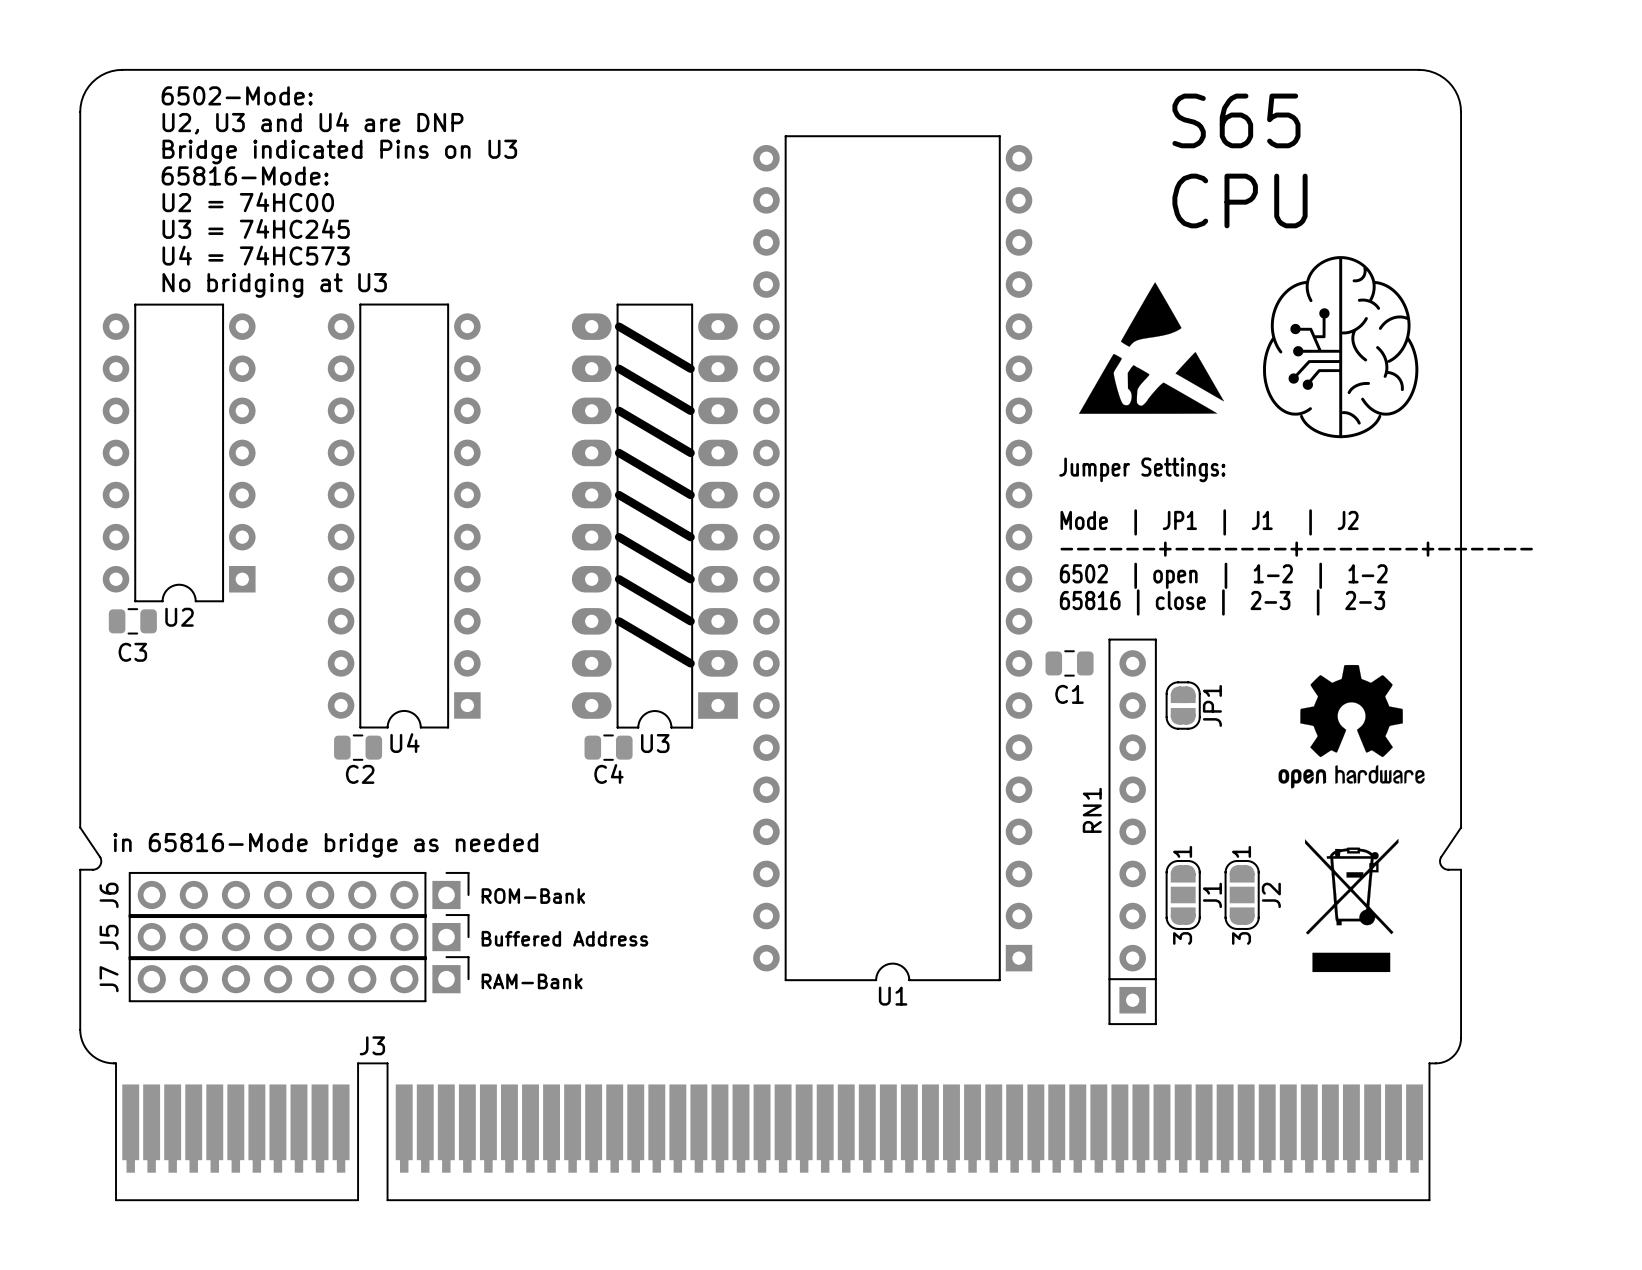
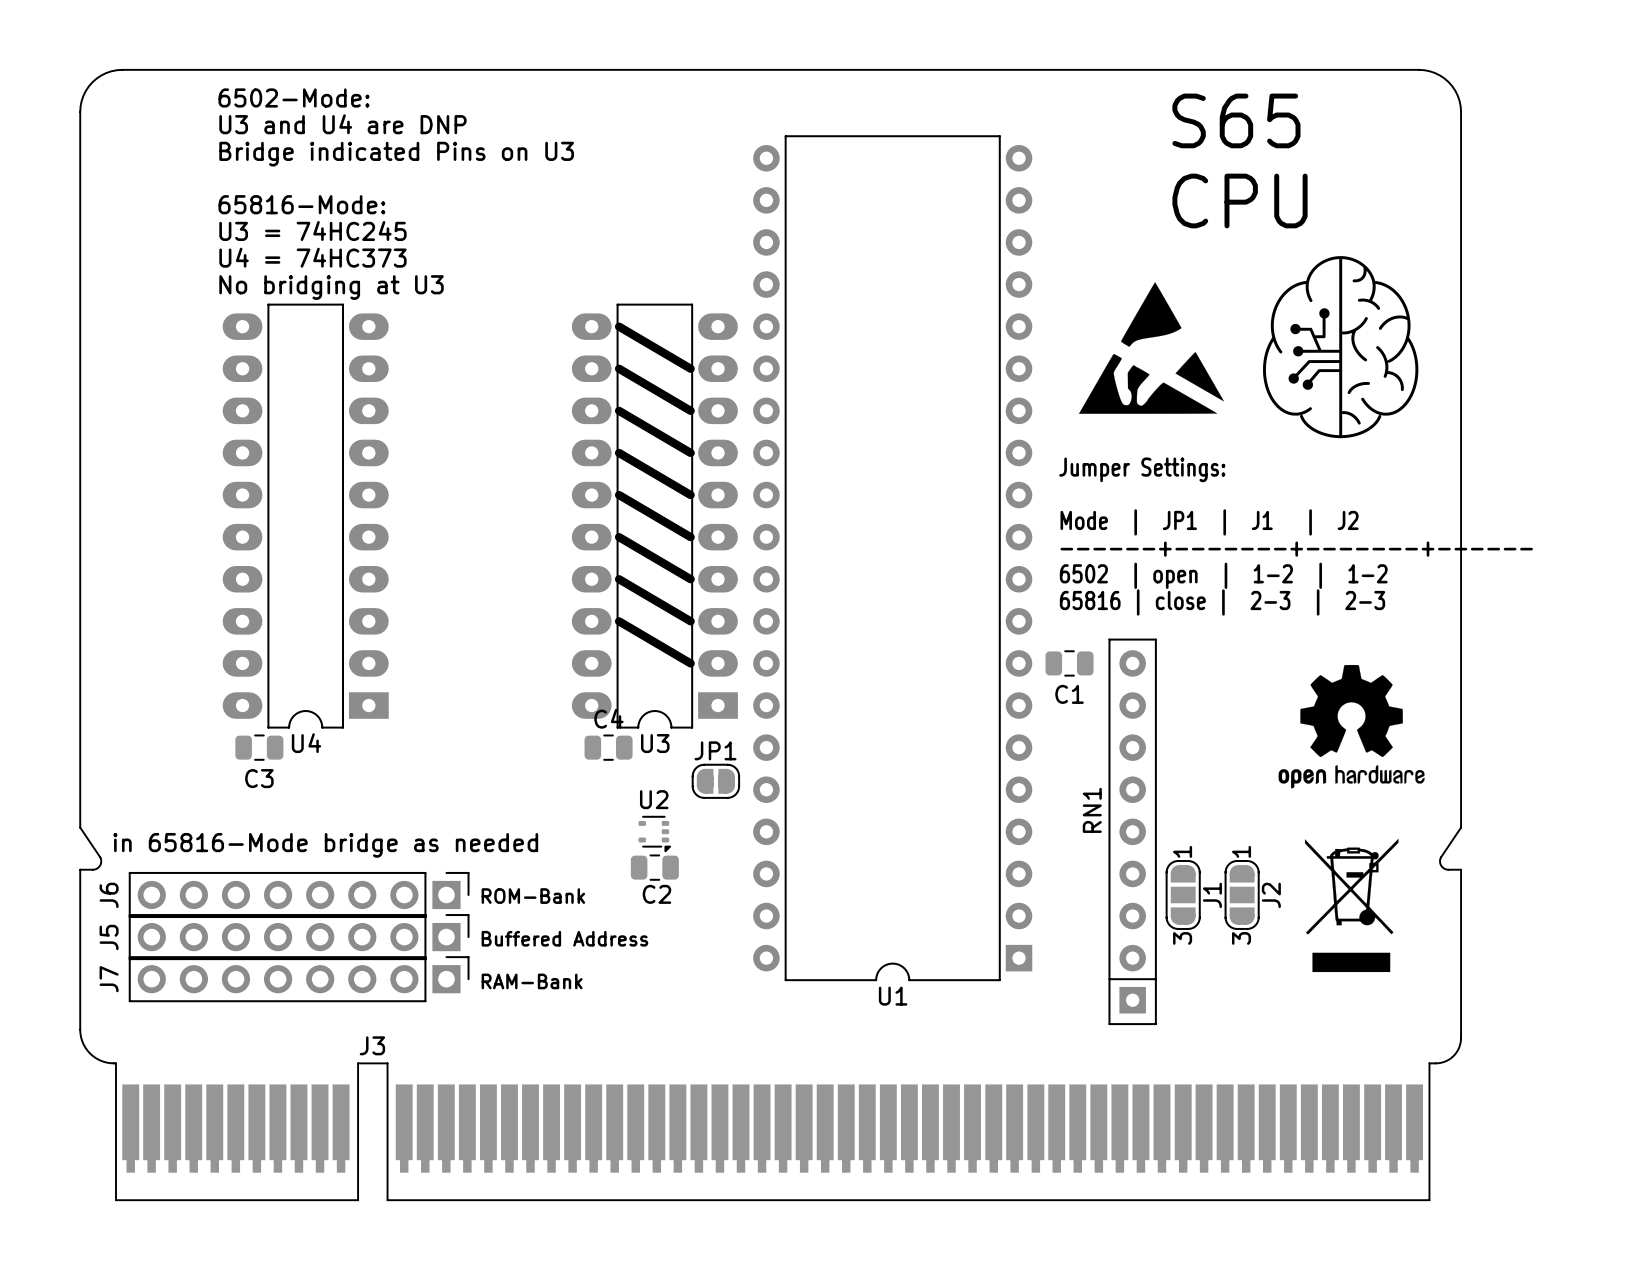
text position: 6502-Mode: (237, 95) -> 6502-Mode: (294, 97)
text: U2, U3 and U4 are DNP (312, 123) -> U3 and U4 are DNP (342, 124)
text position: Bridge indicated Pins on U3 (339, 152) -> Bridge indicated Pins on U3 (396, 154)
text position: 65816-Mode: (245, 175) -> 65816-Mode: (301, 204)
text: U2 = 74HC00 (248, 202) -> none
text position: U3 = 74HC245 (256, 228) -> U3 = 74HC245 (312, 231)
text: U4 = 74HC573 (256, 255) -> U4 = 74HC373 (312, 257)
text position: No bridging at U3 (274, 285) -> No bridging at U3 (331, 287)
U2 footprint: [102, 303, 256, 603] -> [638, 815, 672, 853]
U4 footprint: [327, 303, 481, 729] -> [222, 303, 389, 729]
U2 name position: U2 (179, 617) -> U2 (654, 799)
C3 position: (132, 621) -> (259, 747)
JP1 rotation: 0° (1183, 705) -> 90° clockwise (715, 781)
JP1 position: (1183, 705) -> (715, 781)
JP1 name position: JP1 (1212, 705) -> JP1 (715, 750)
C2 position: (358, 747) -> (654, 867)
C4 name position: C4 (608, 773) -> C4 (608, 718)

